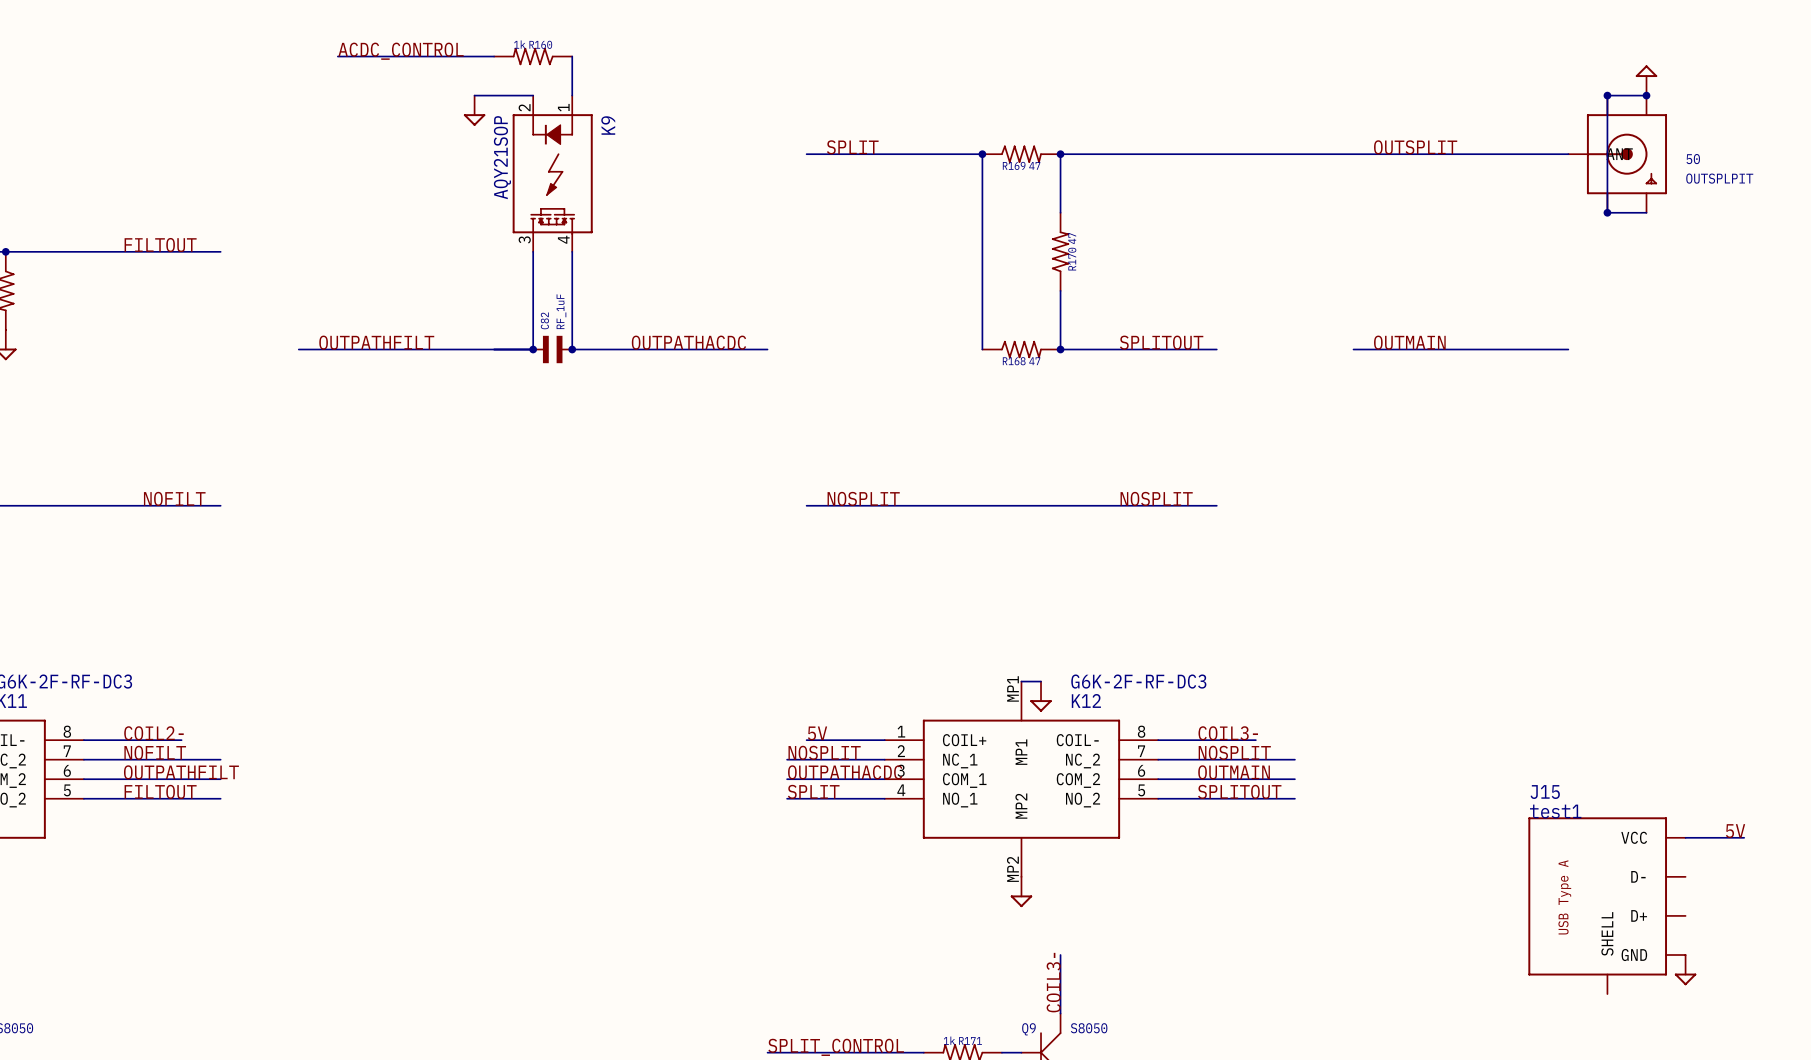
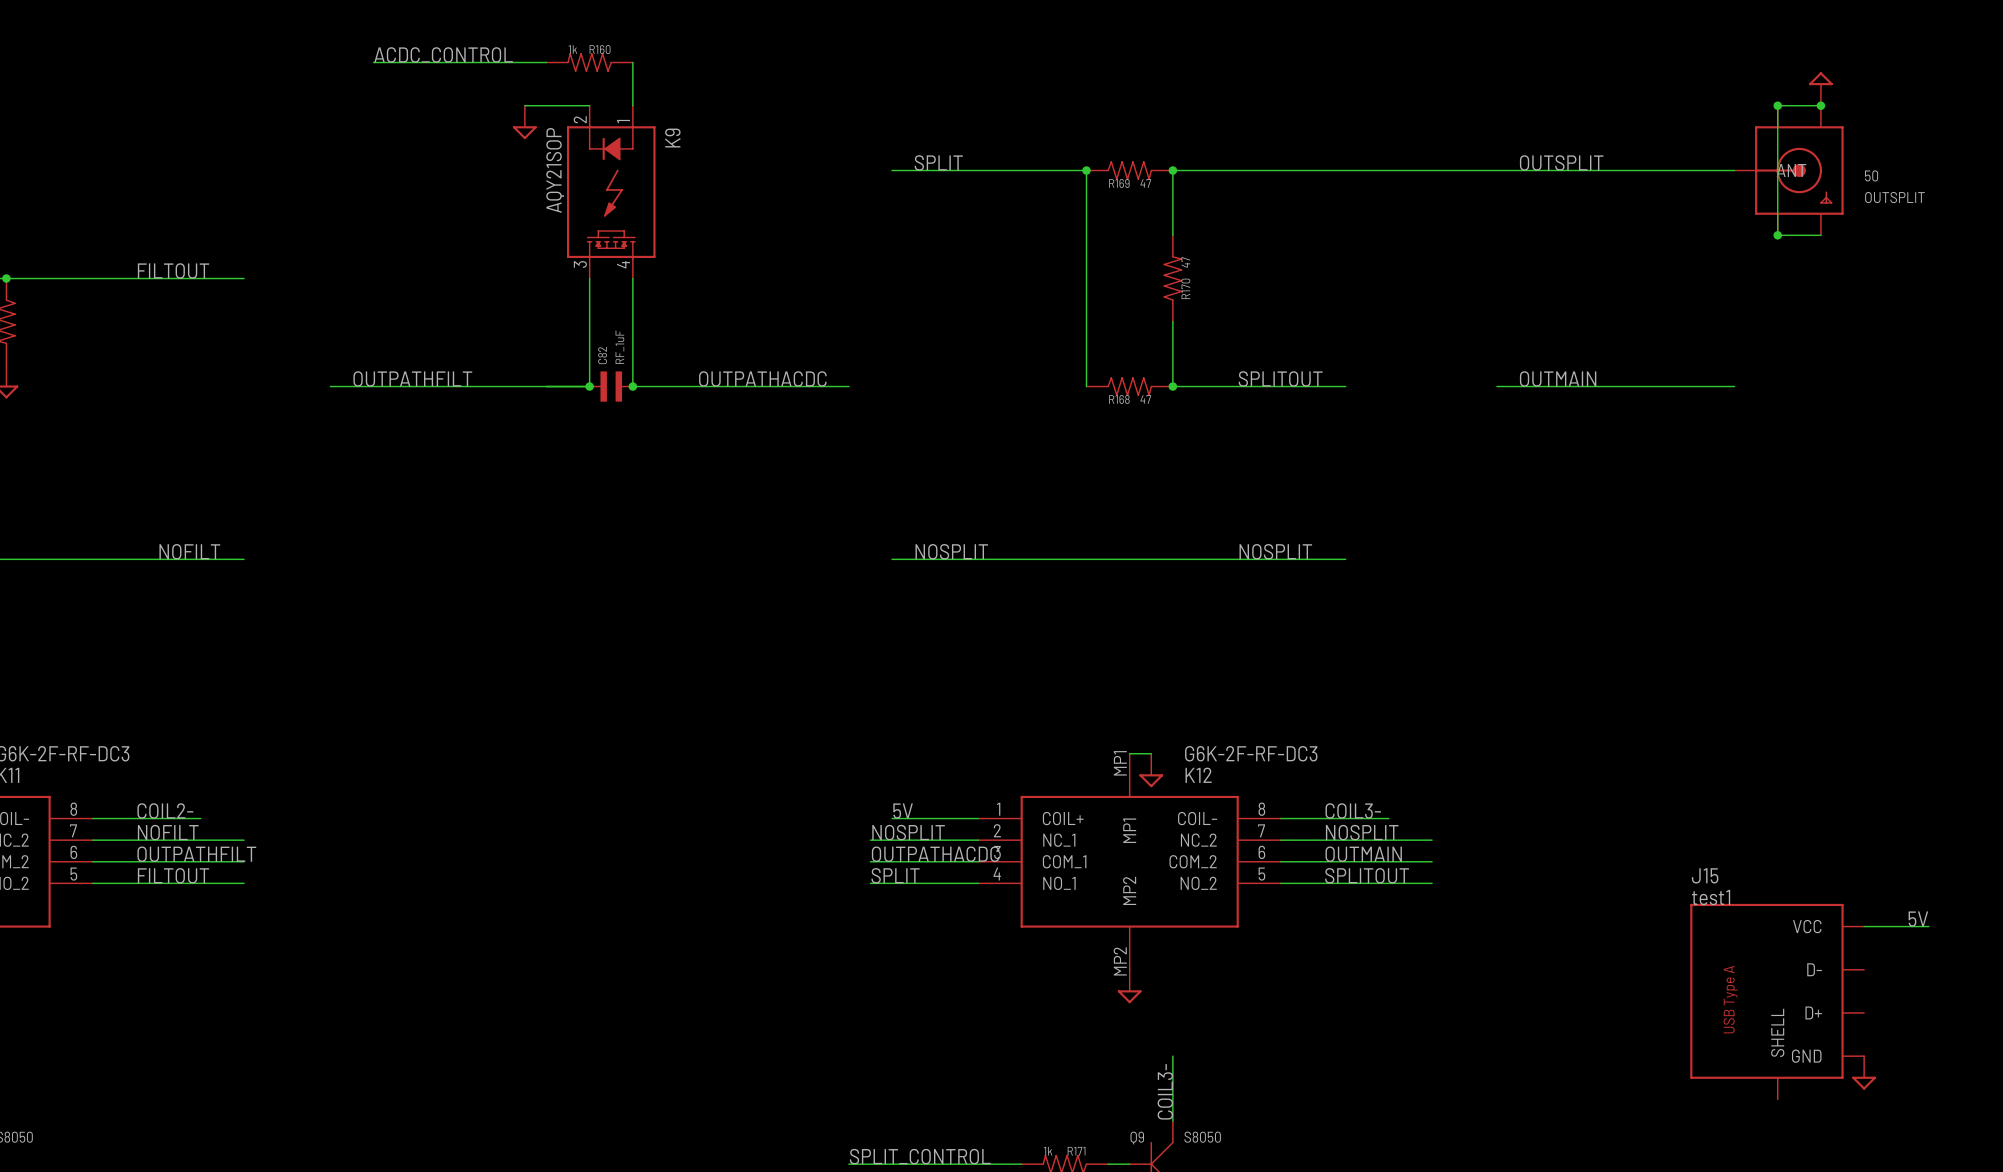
OUTSPLPIT name: OUTSPLPIT (1719, 178) -> OUTSPLIT (1894, 197)

